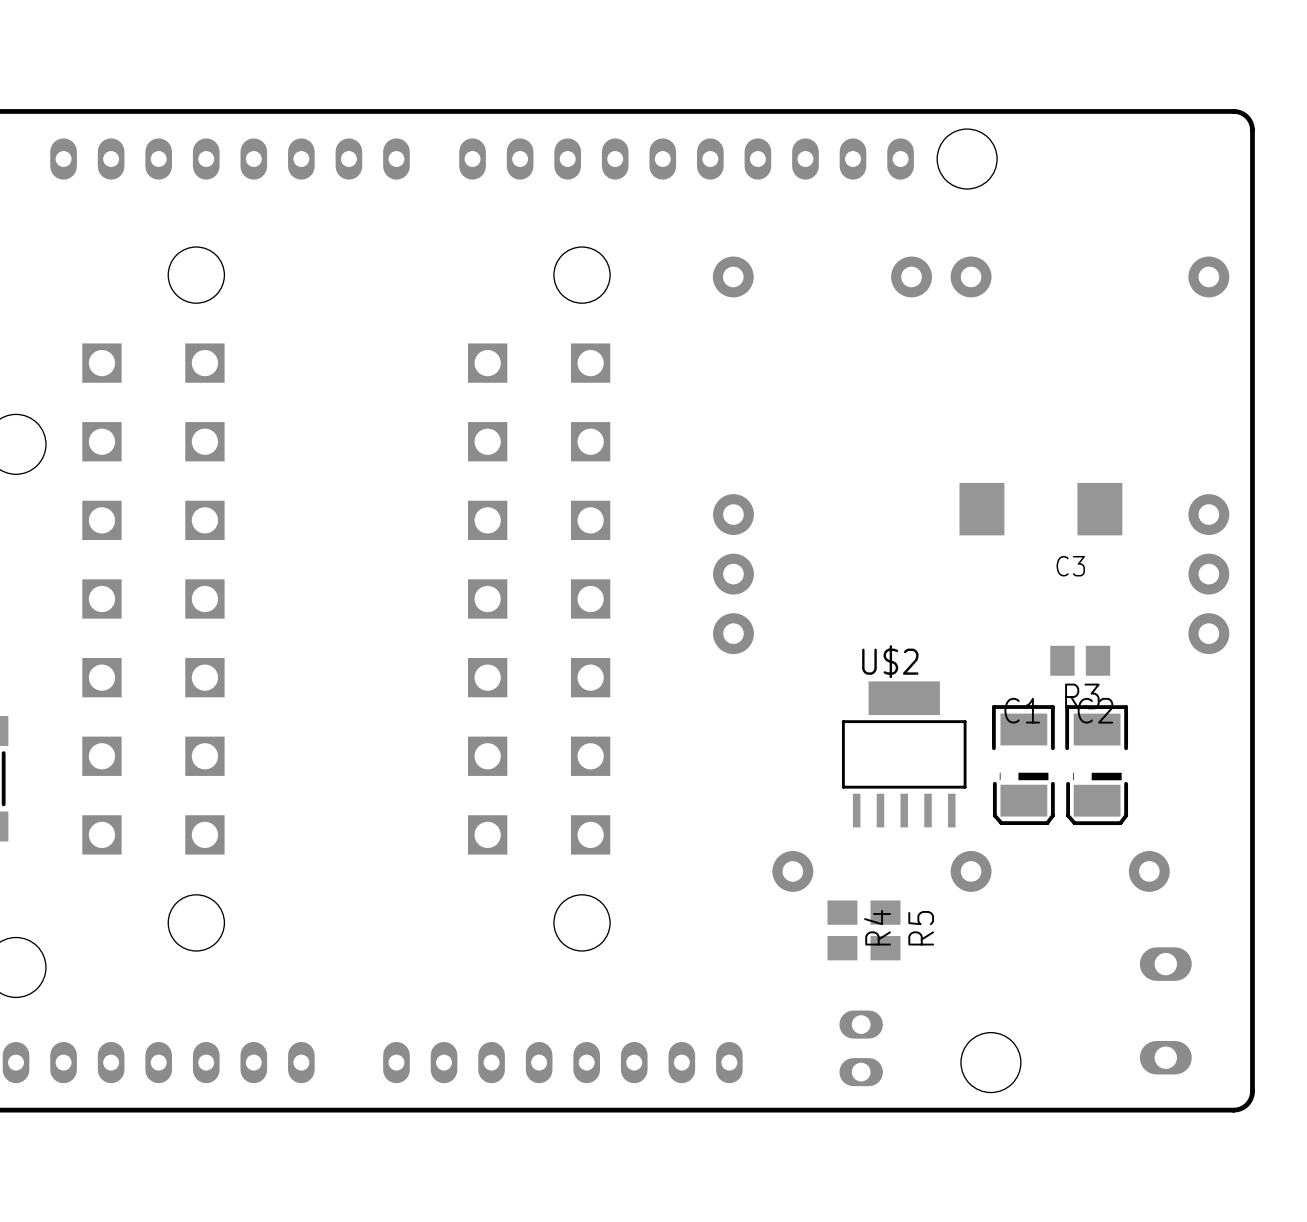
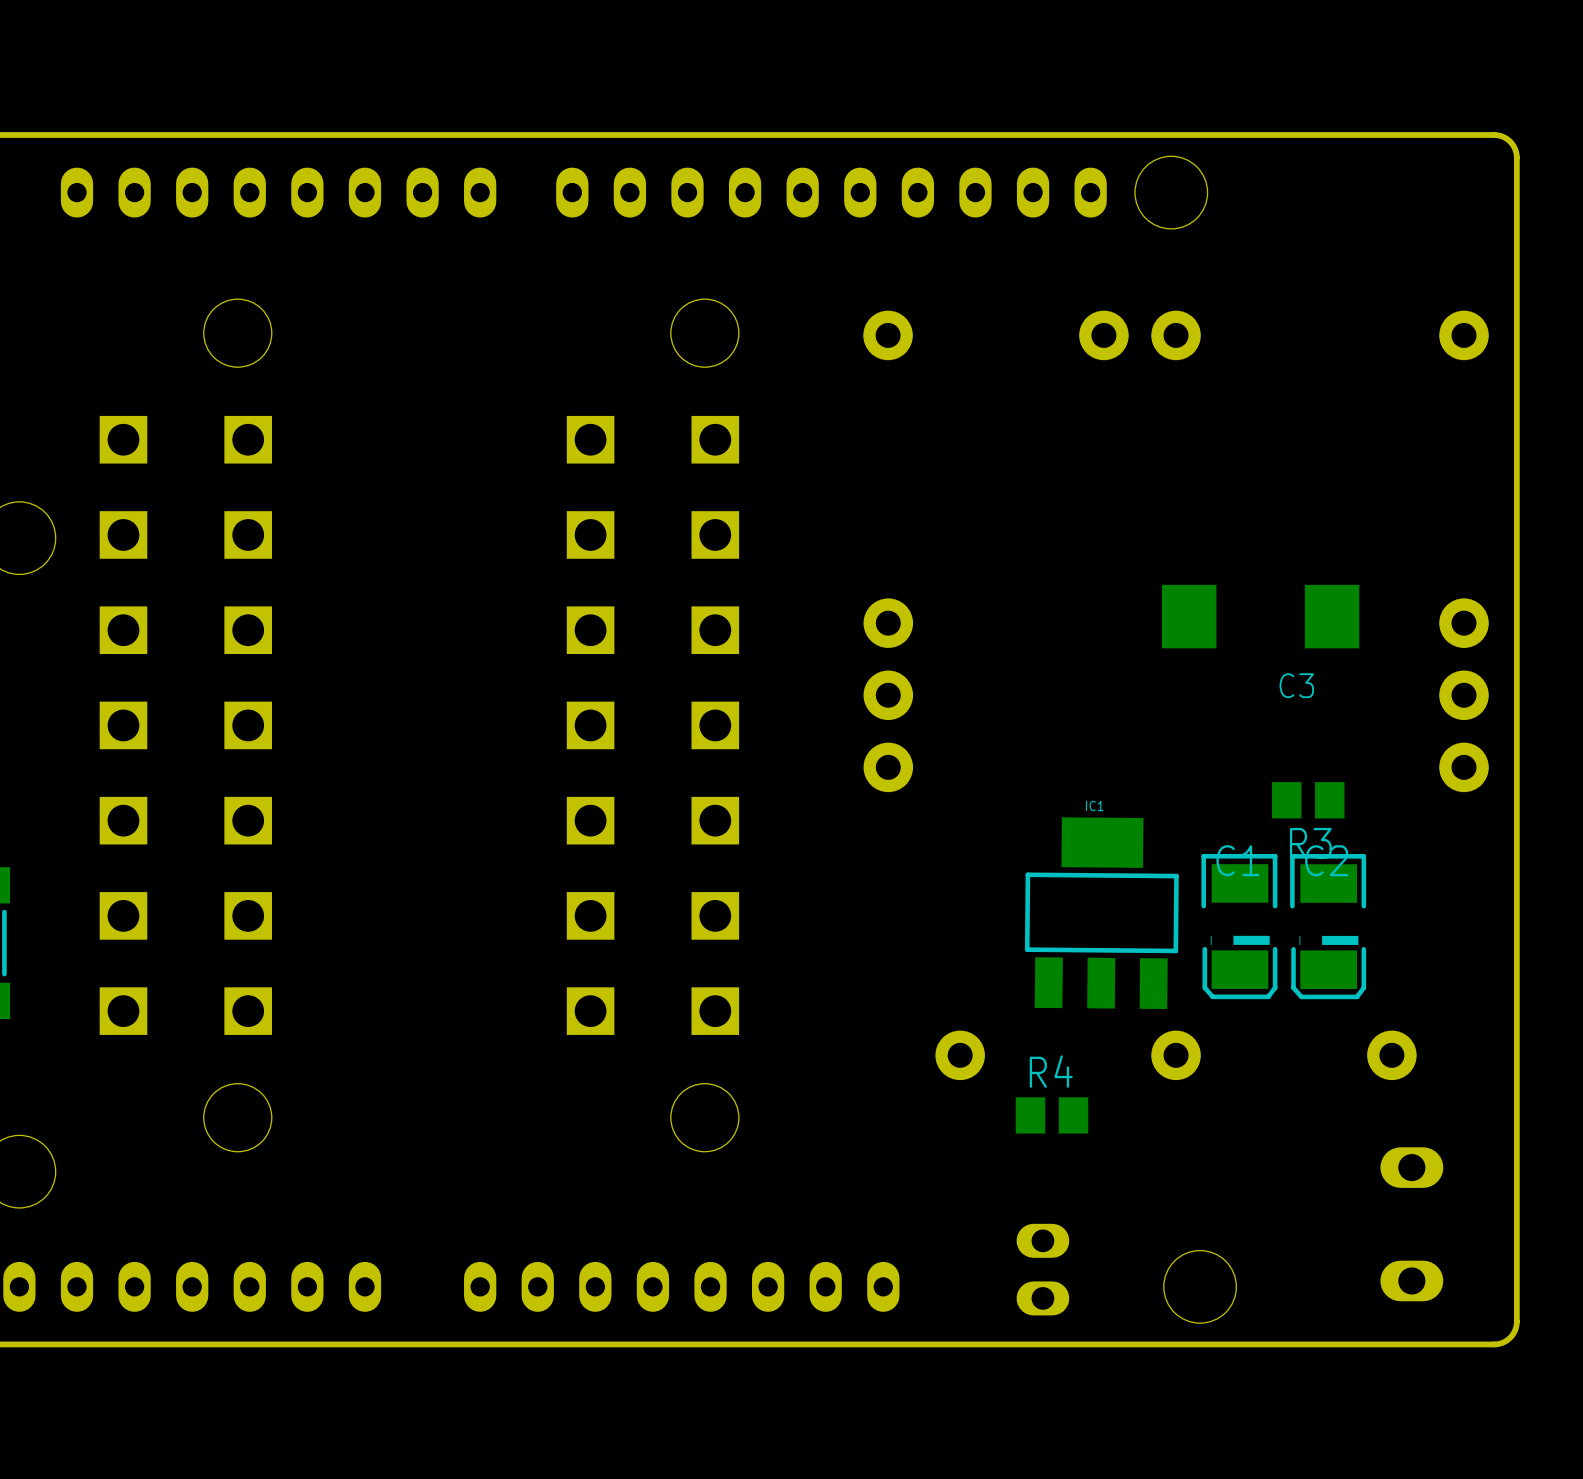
U$2: (904, 754) -> none
IC1: none -> (1101, 913)
R4 name position: R4 (877, 927) -> R4 (1051, 1071)
R4 rotation: 0° (842, 930) -> 90° clockwise (1052, 1115)
R5: (885, 930) -> none

